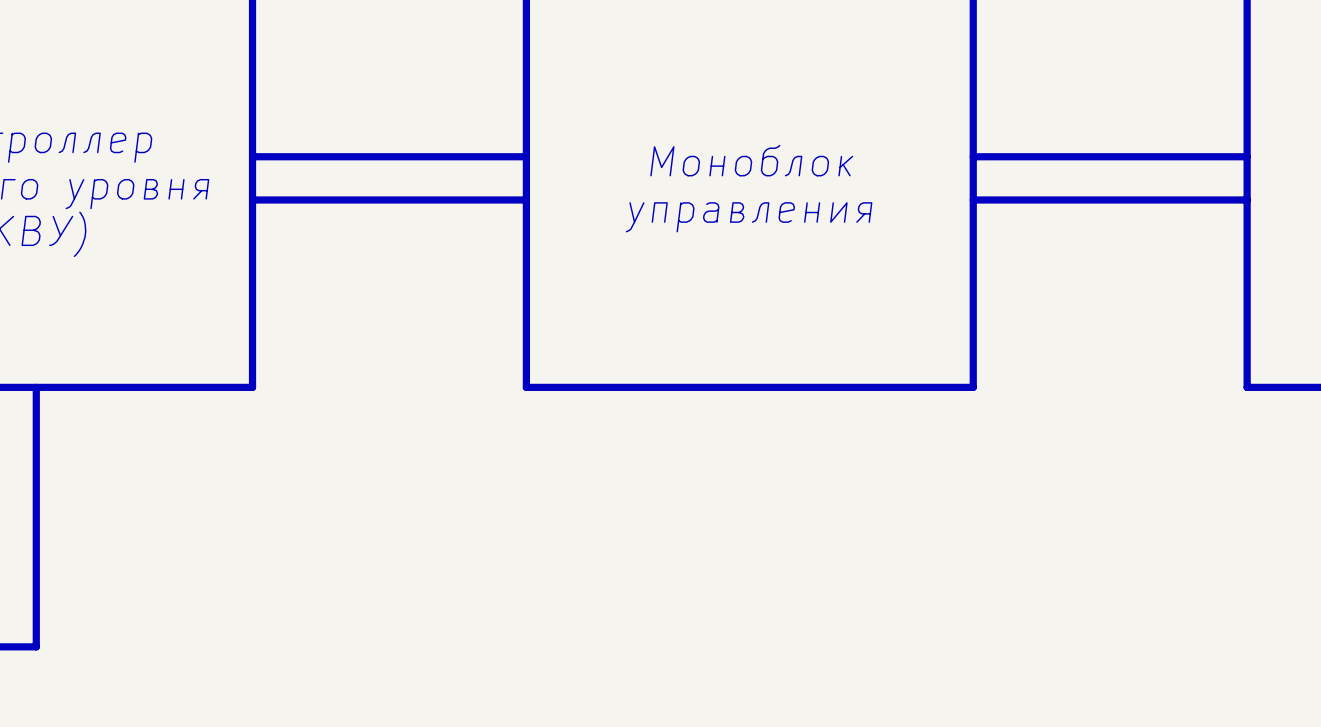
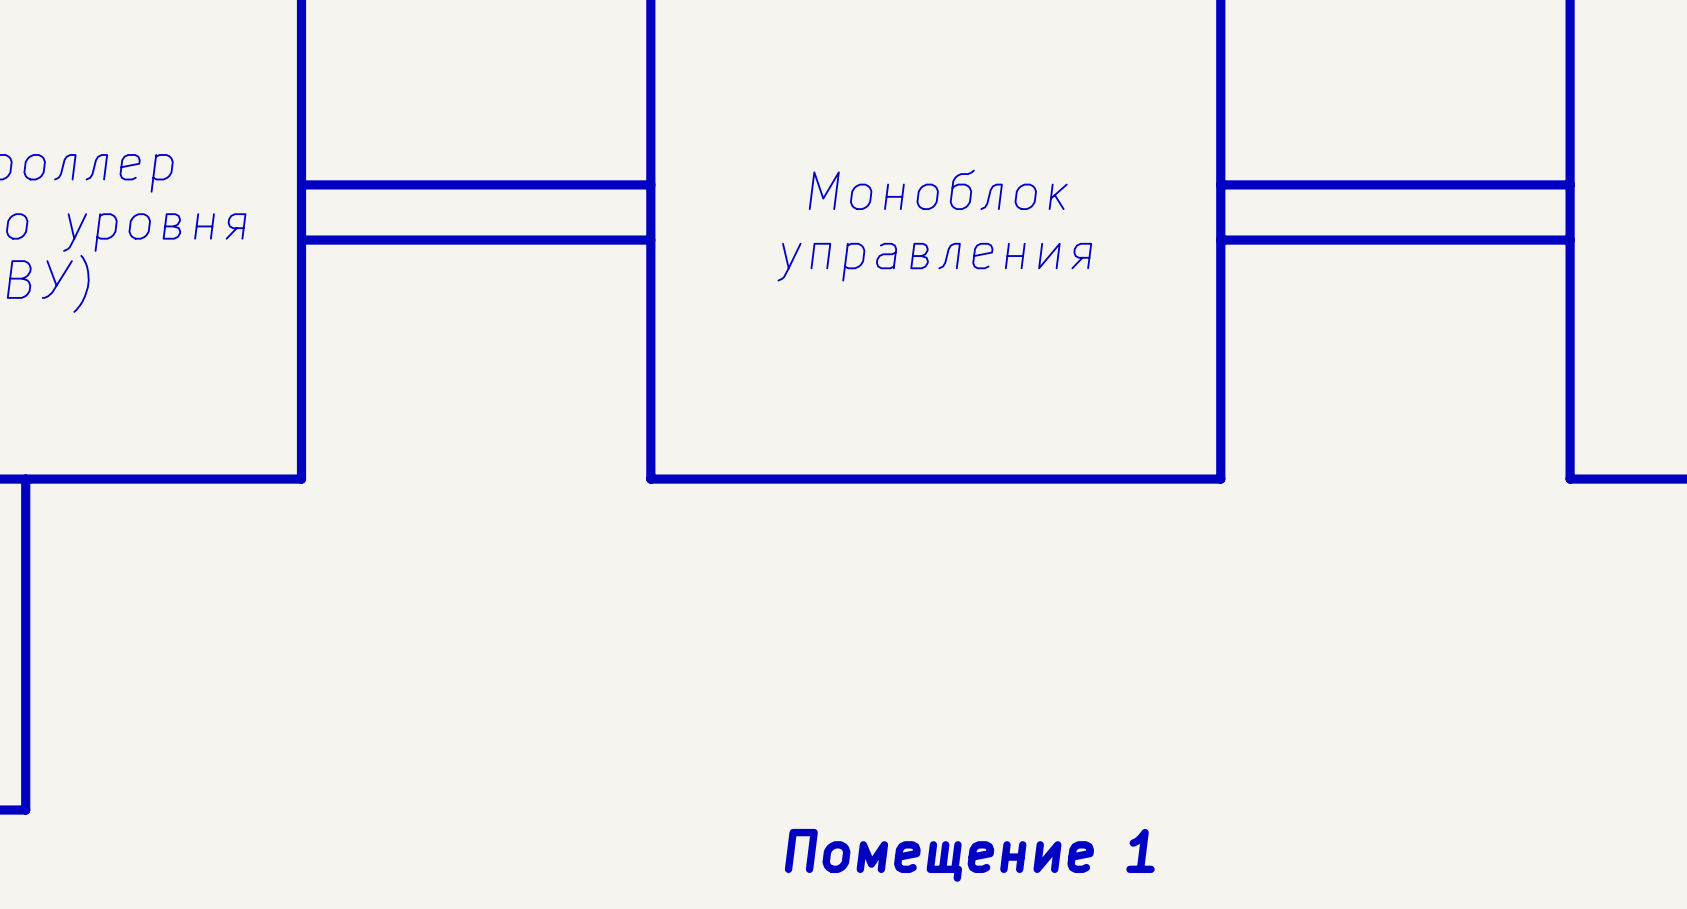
text: none -> Помещение 1 (969, 855)

